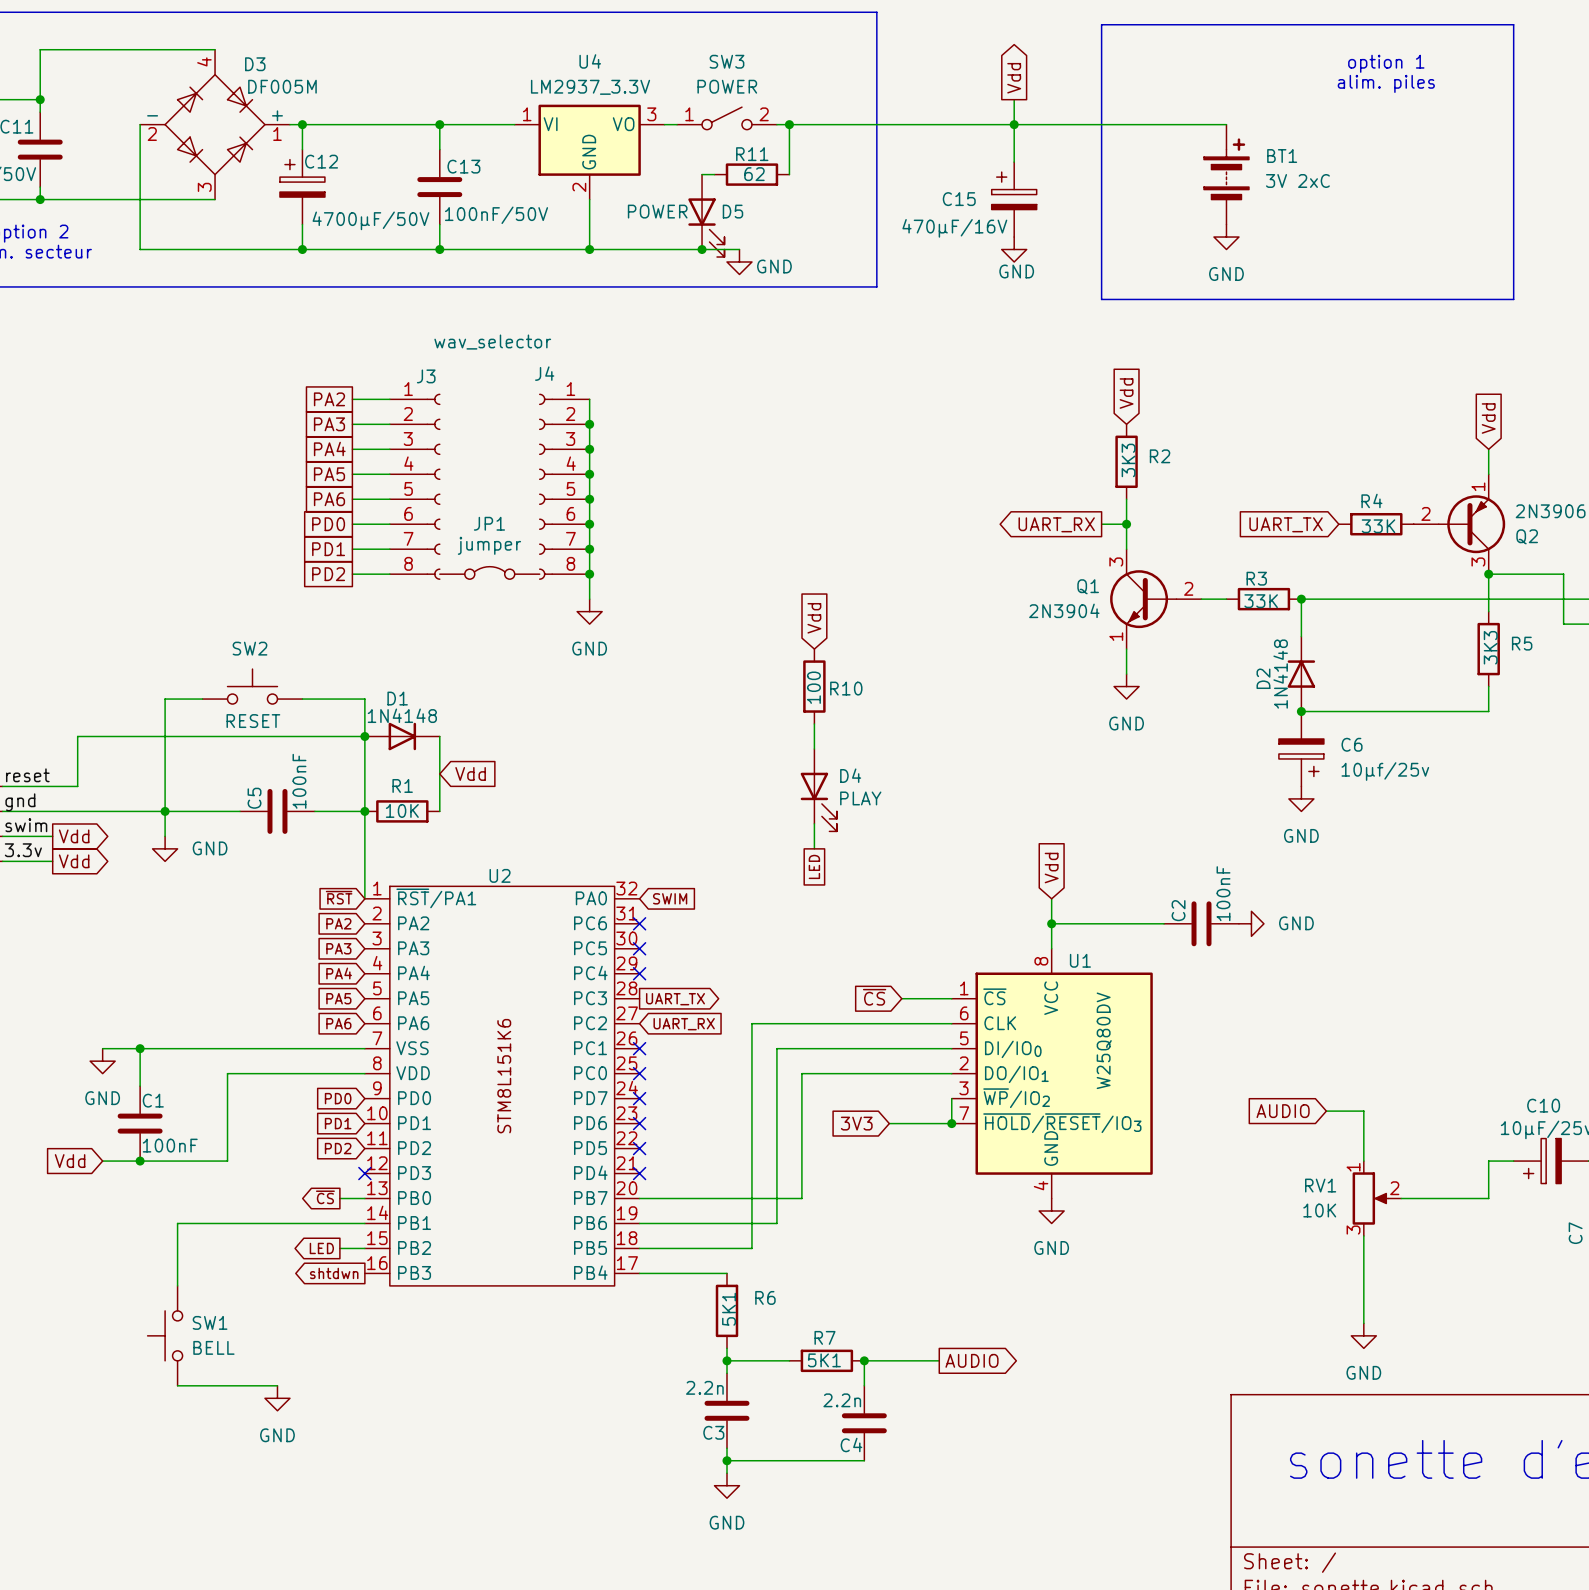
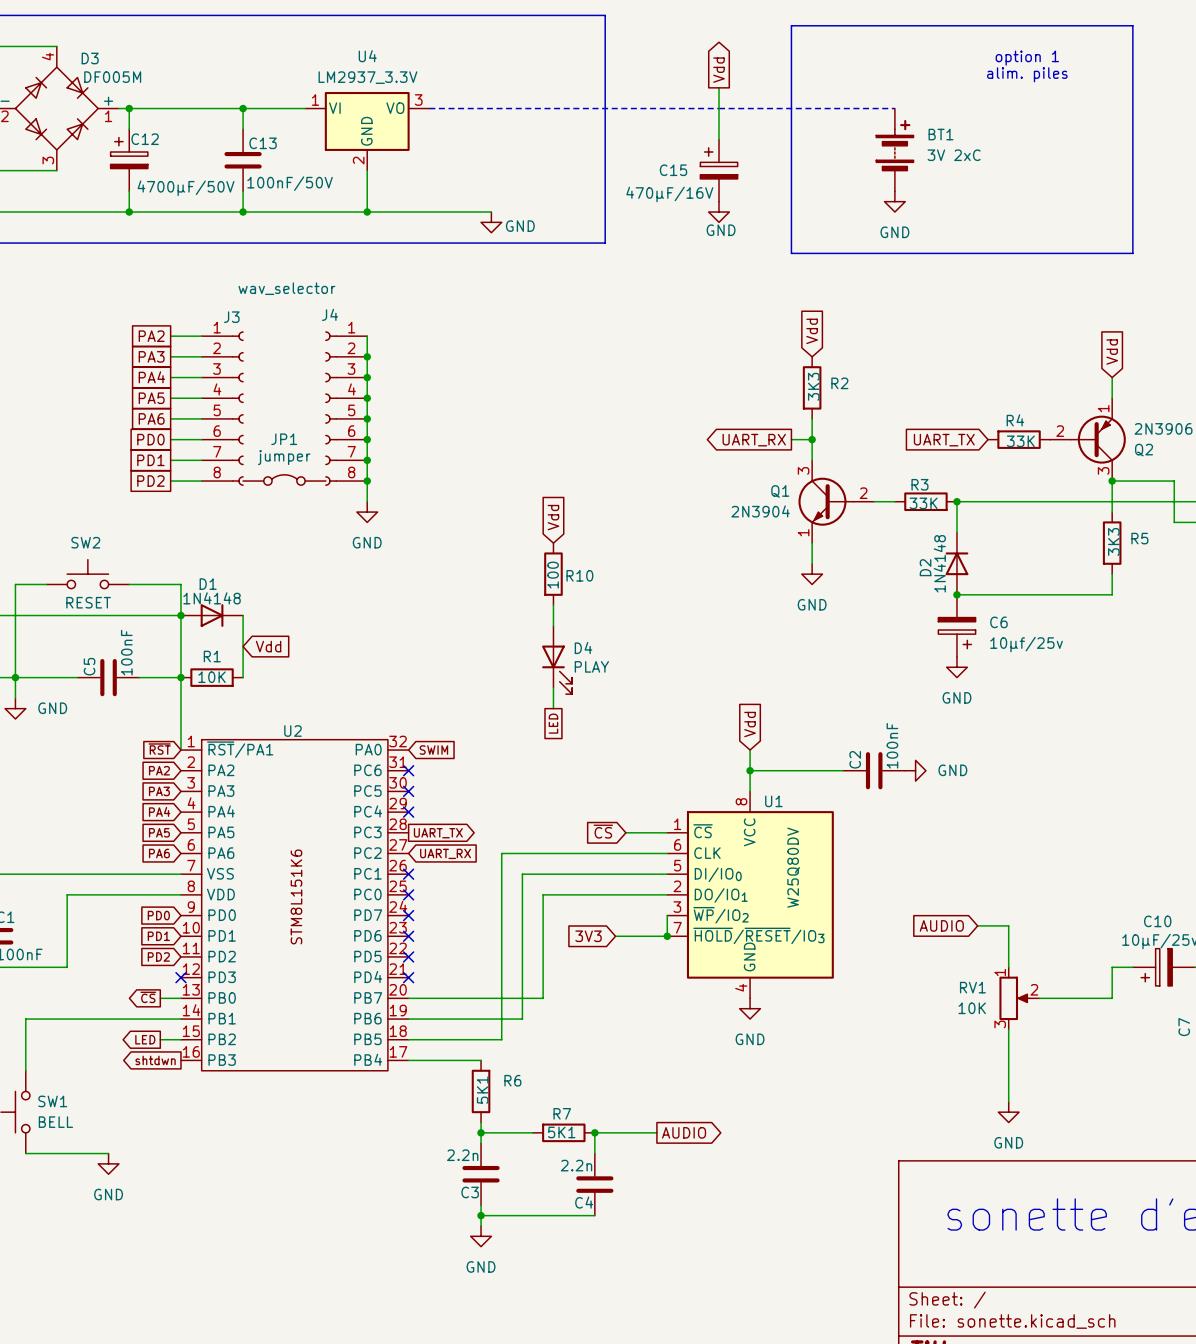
SW3: POWER (726, 118) -> none
line: none -> (429, 108) (894, 108)
wire: (789, 124) (789, 174) -> none
junction: (789, 124) -> none
junction: (1014, 124) -> none
wire: (702, 174) (714, 174) -> none
R11: 62 (751, 174) -> none
D5: POWER (706, 215) -> none
junction: (702, 249) -> none

